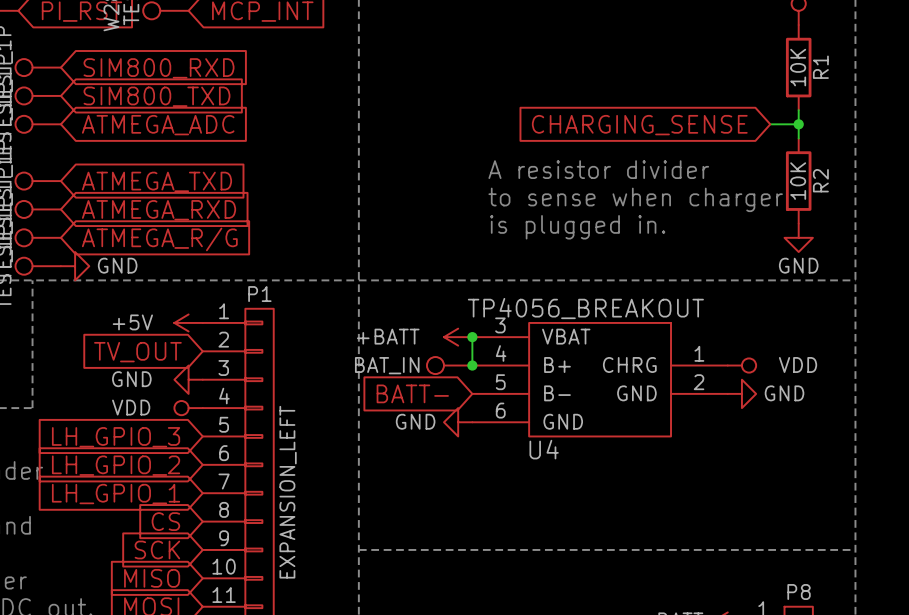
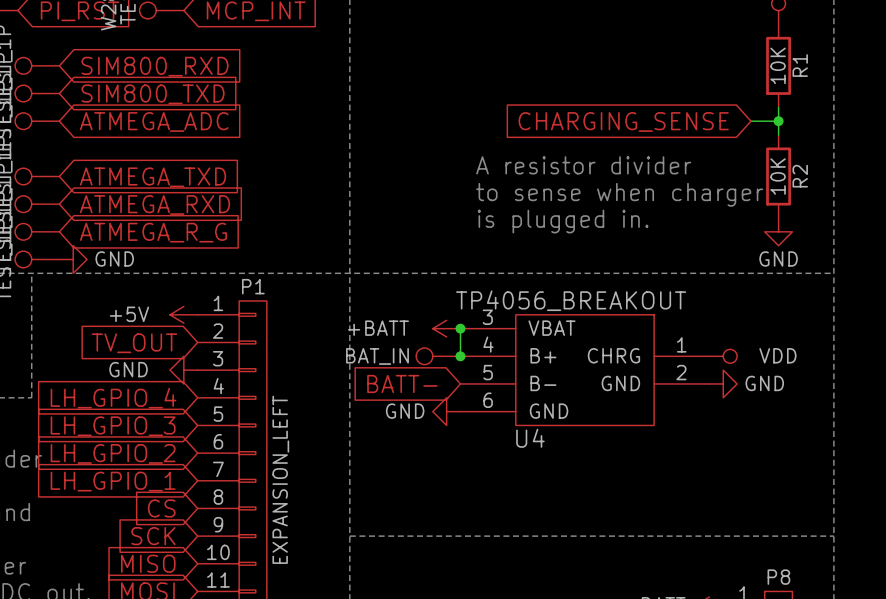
global label: ATMEGA_R/G (159, 239) -> ATMEGA_R_G (153, 232)
global label: none -> LH_GPIO_4 (113, 398)
power symbol: VDD (188, 408) -> none

